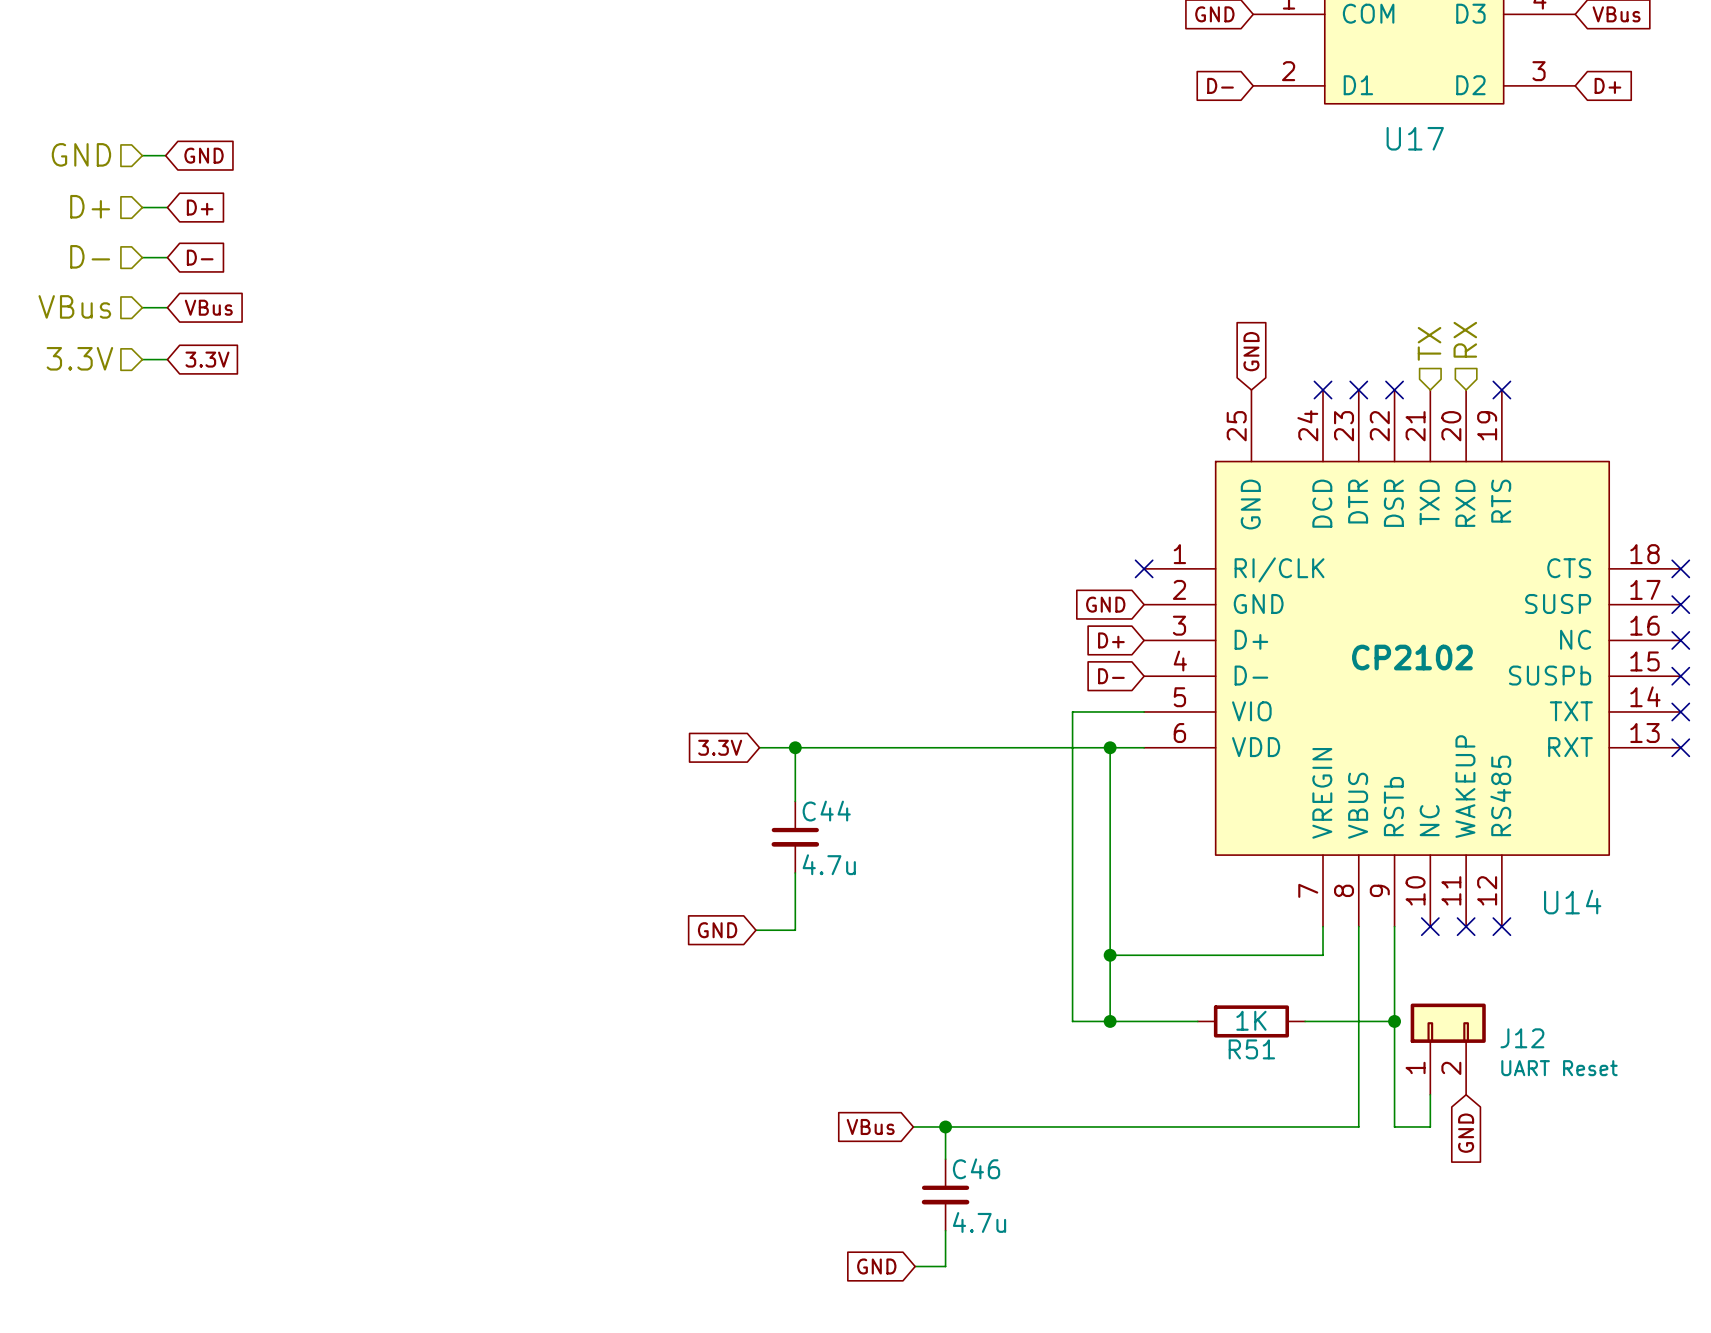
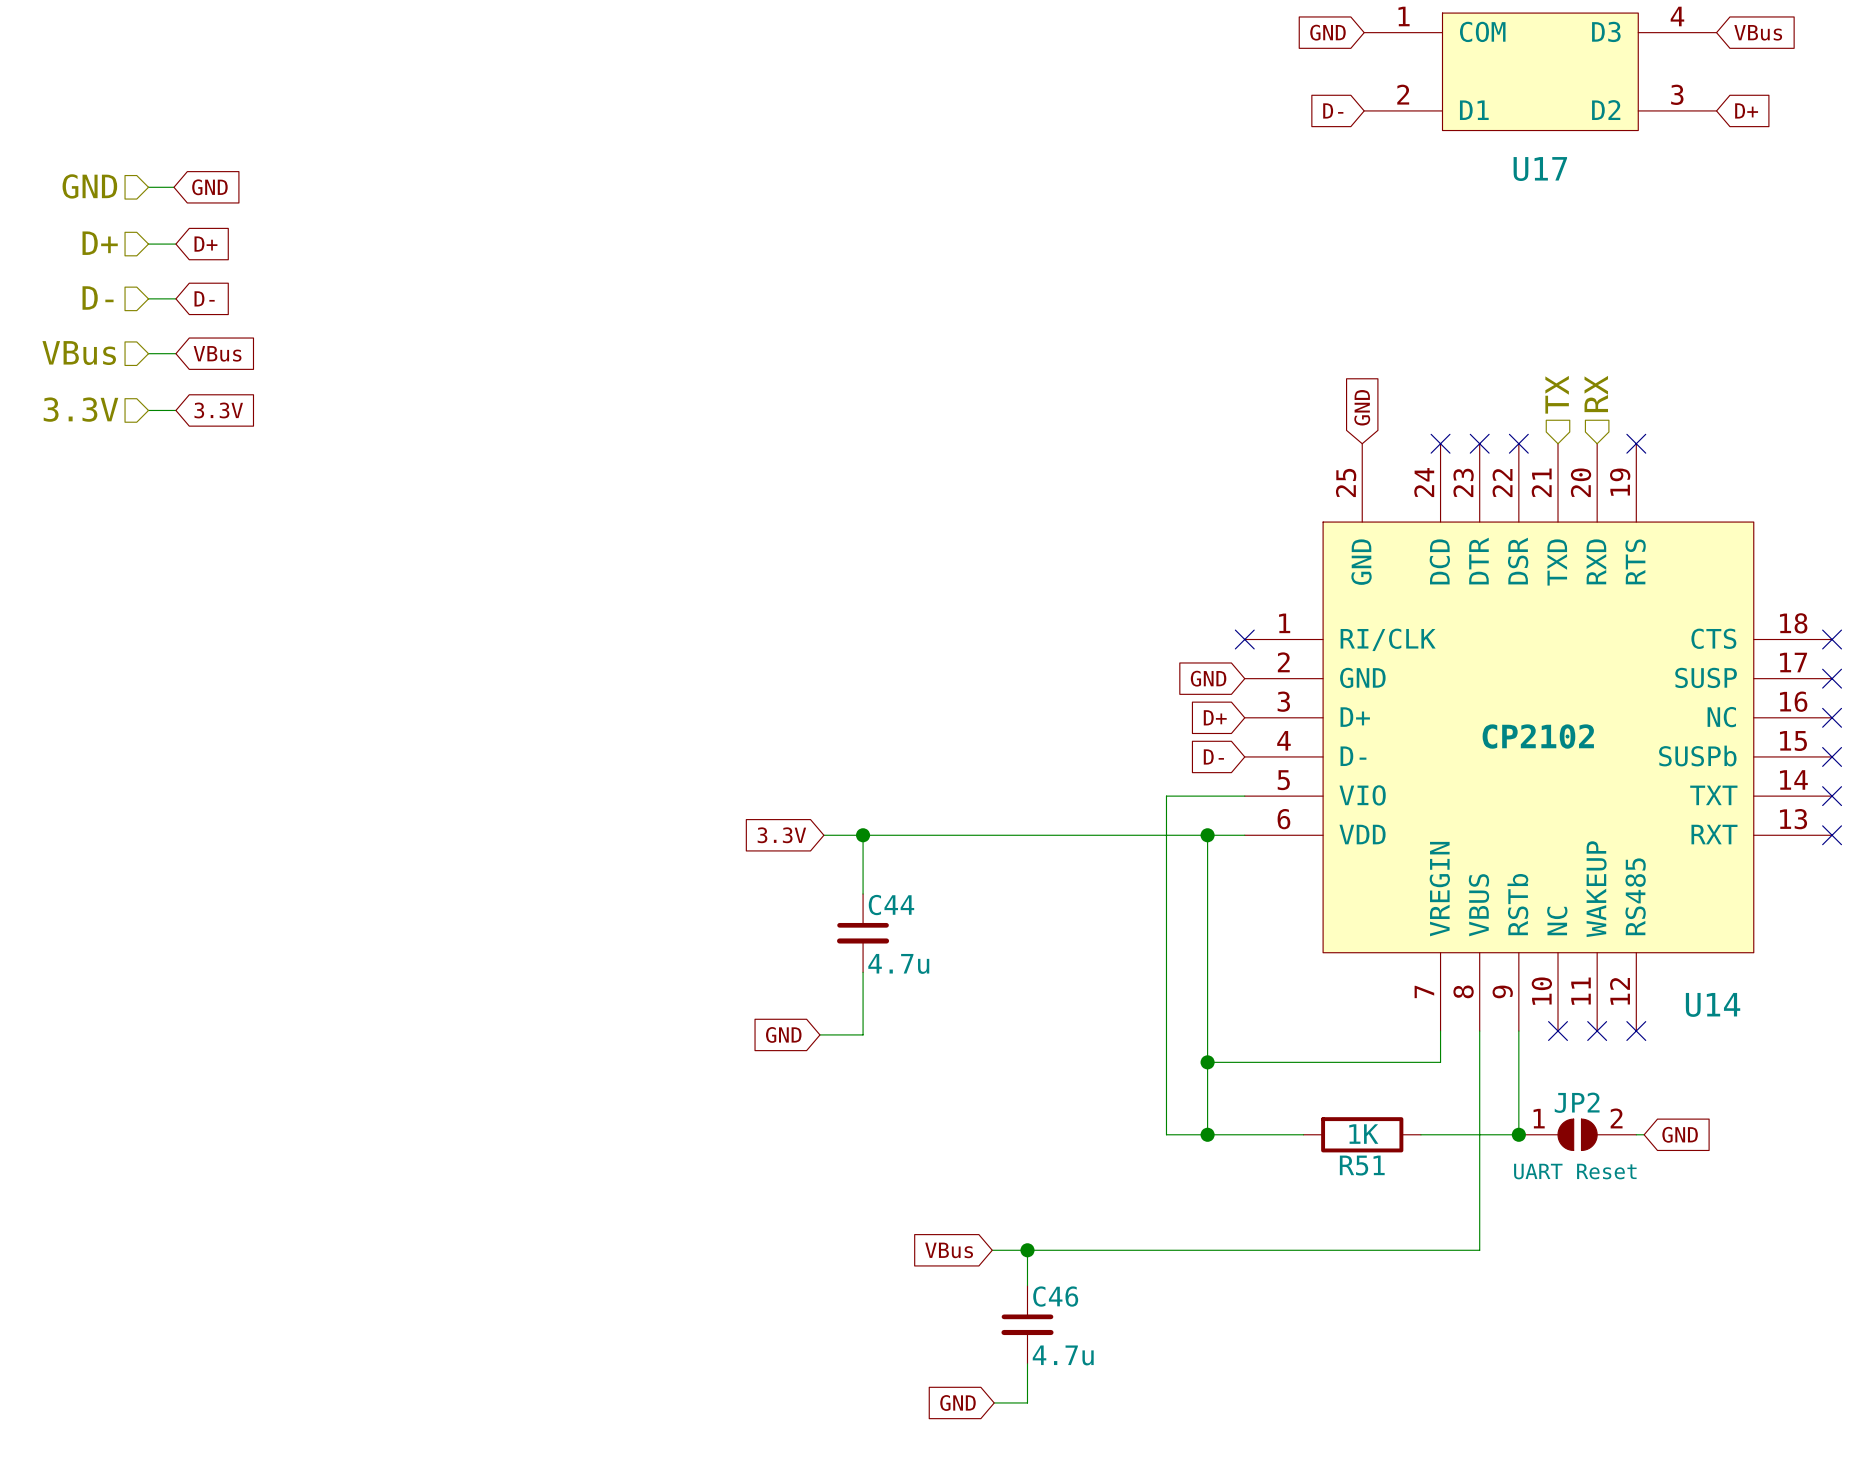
wire: (1394, 1021) (1394, 1126) (1430, 1126) (1430, 1094) -> none
JP2: none -> UART Reset (1577, 1134)
wire: none -> (1636, 1134) (1644, 1134)
J12: UART Reset (1448, 1049) -> none
global label rotation: 0° (1466, 1133) -> 90° counterclockwise (1680, 1134)
global label position: GND (1466, 1133) -> GND (1680, 1134)

